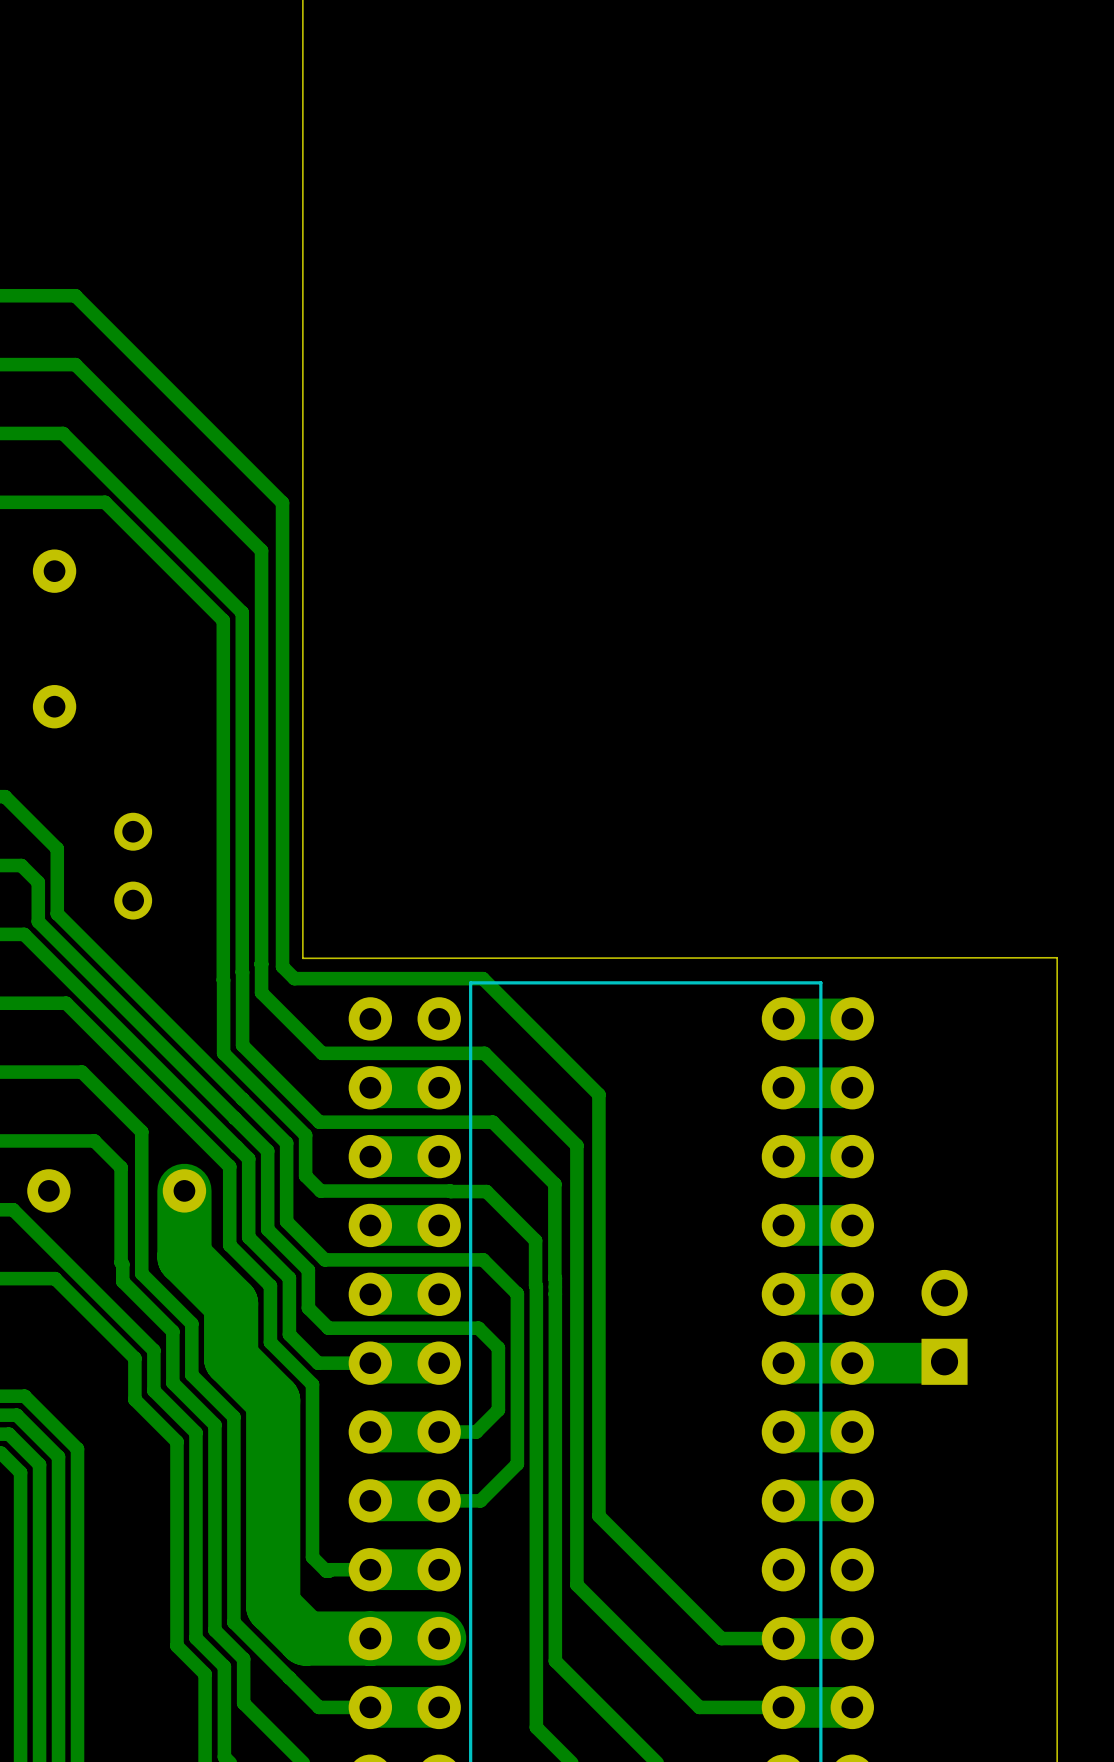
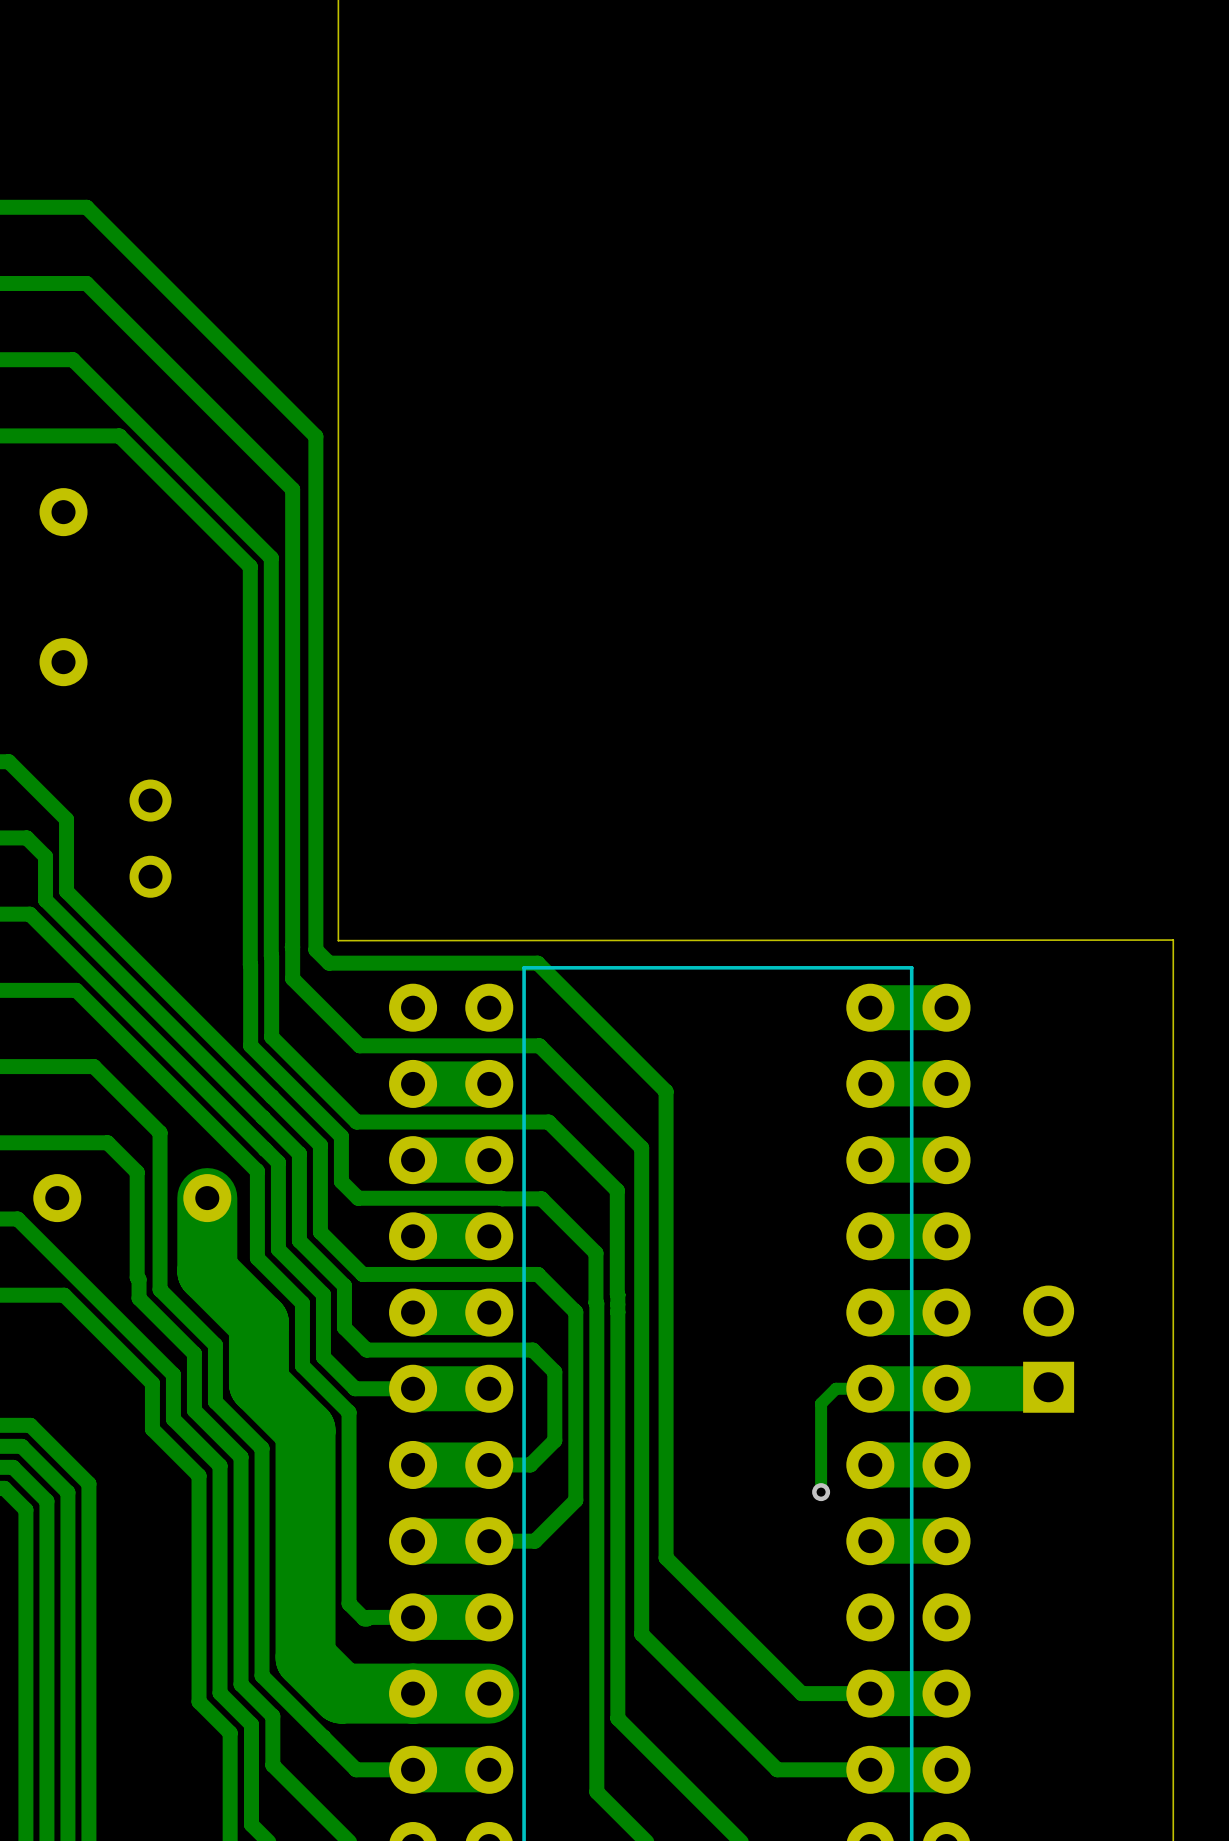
track: none -> (870, 1388) (835, 1388) (821, 1403) (821, 1492)
via: none -> (821, 1492)

